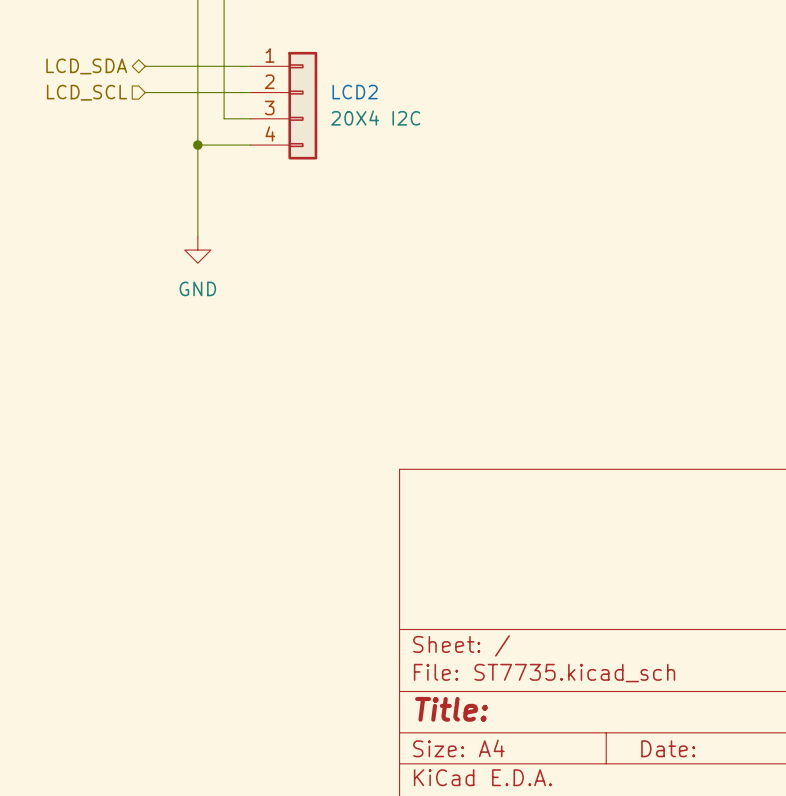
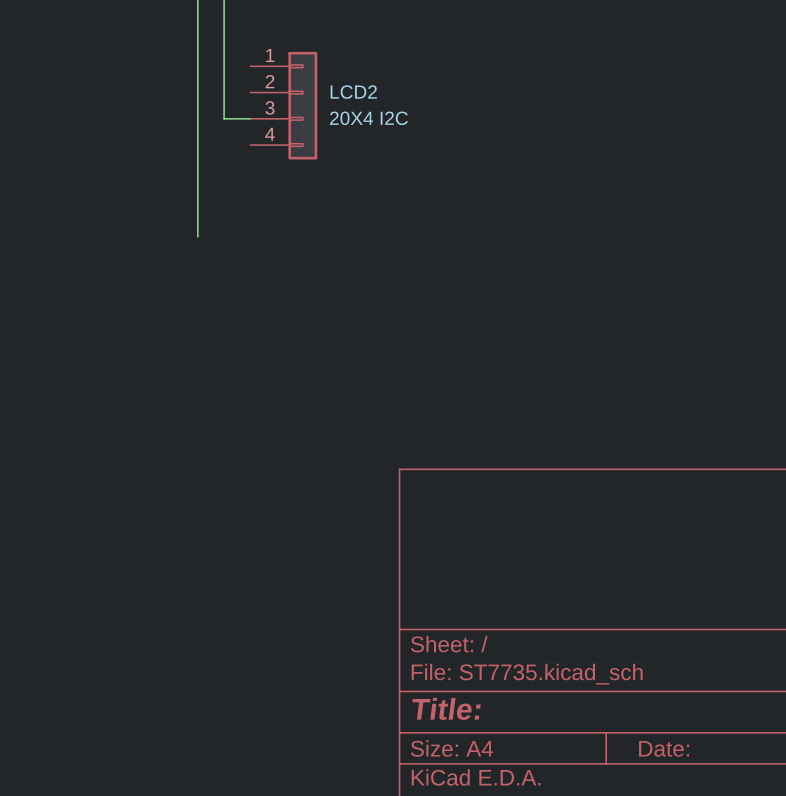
hierarchical label: LCD_SDA (86, 66) -> none
wire: (145, 66) (250, 66) -> none
hierarchical label: LCD_SCL (87, 92) -> none
wire: (145, 92) (250, 92) -> none
wire: (197, 145) (250, 145) -> none
junction: (197, 145) -> none
power symbol: GND (197, 250) -> none

